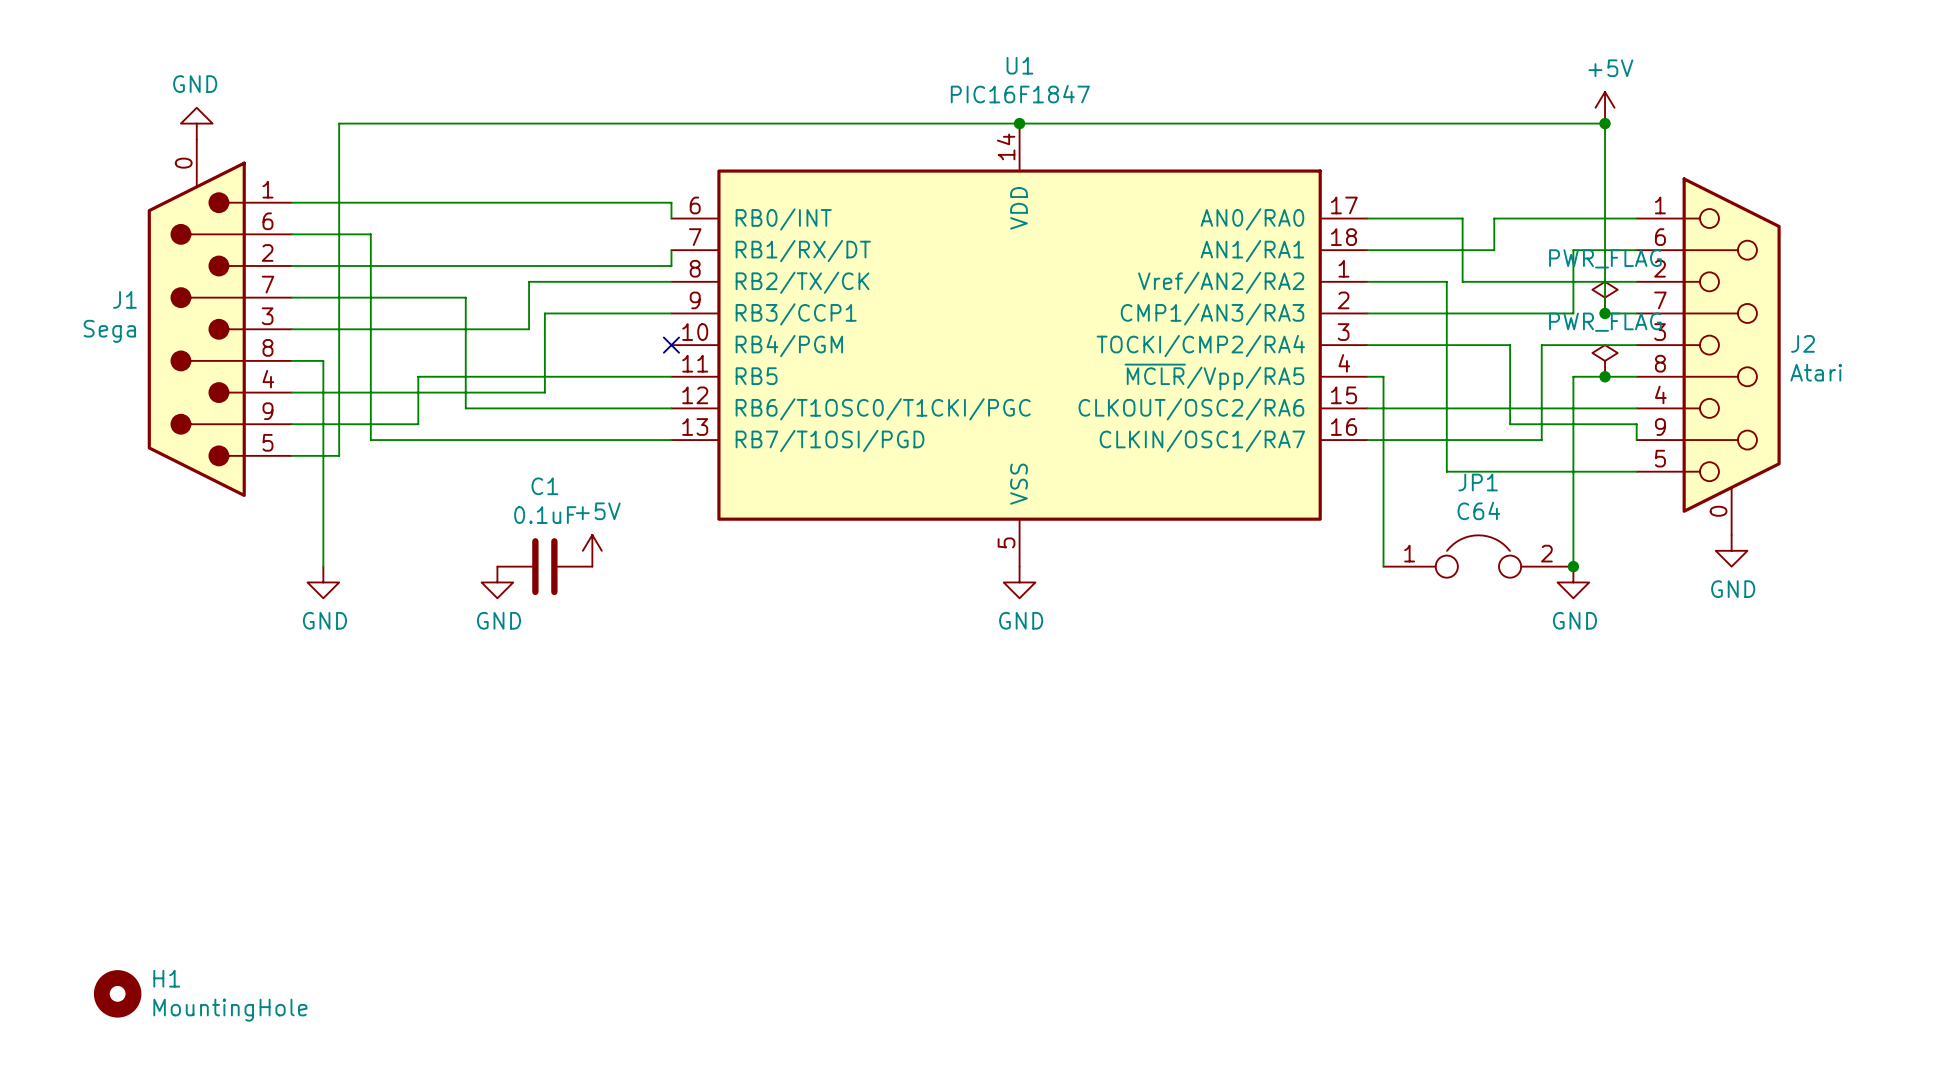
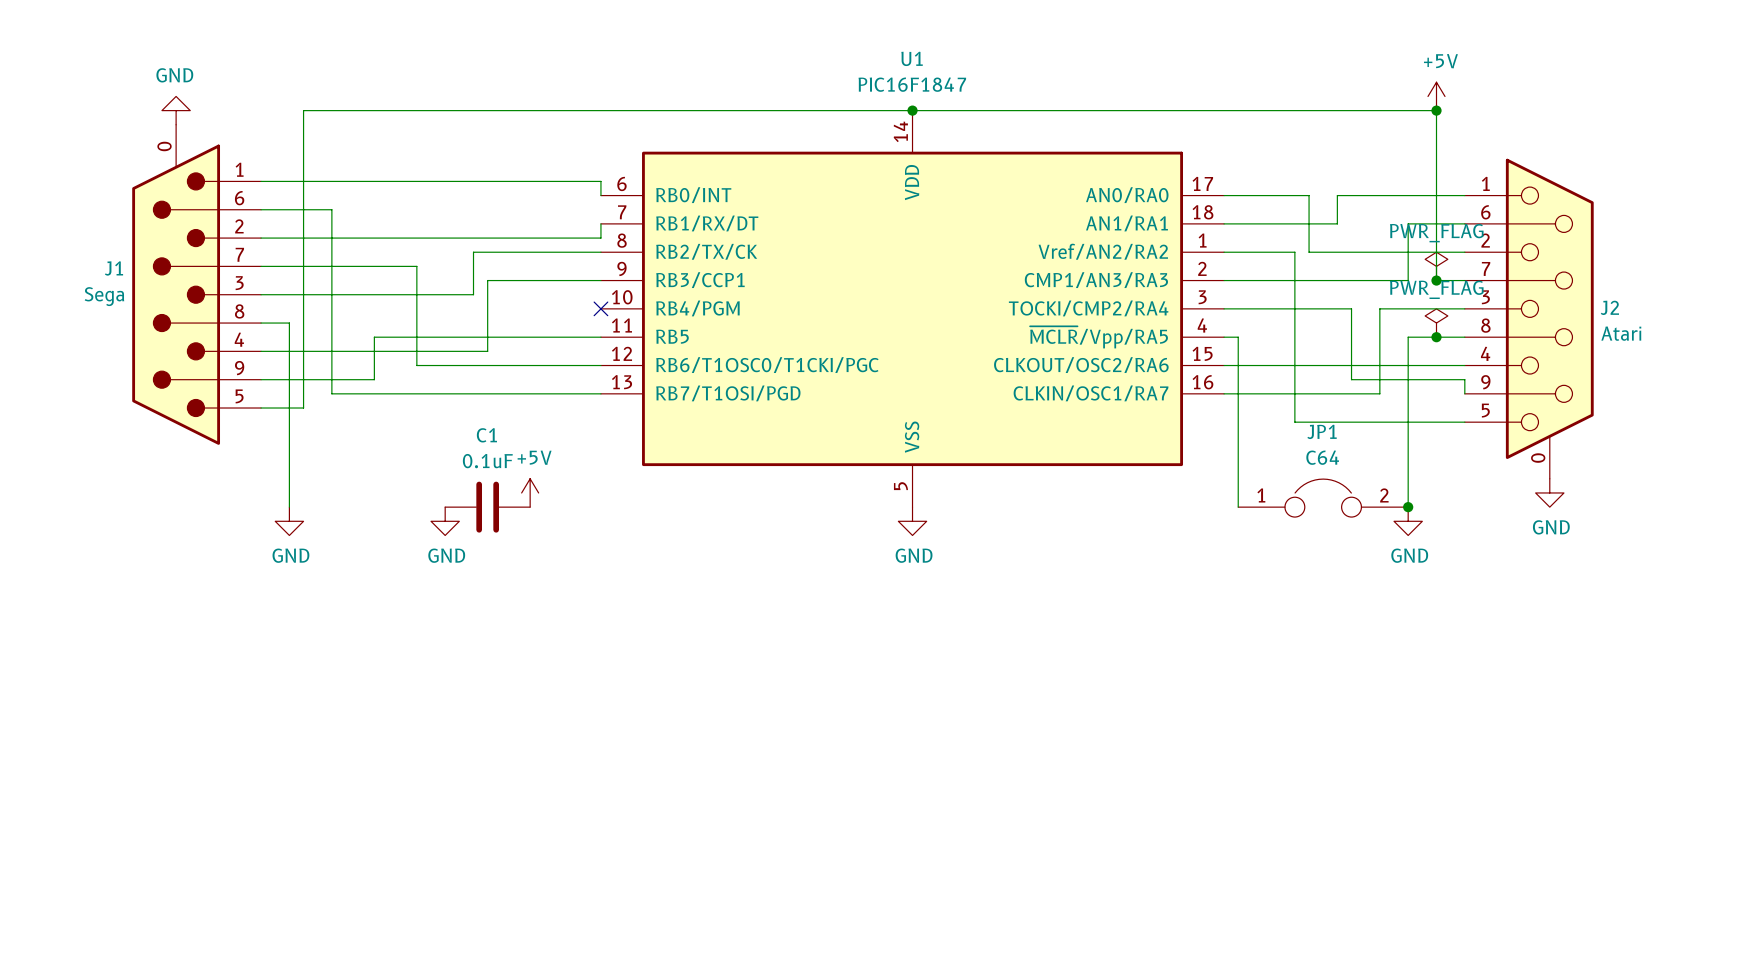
H1: MountingHole (117, 993) -> none

